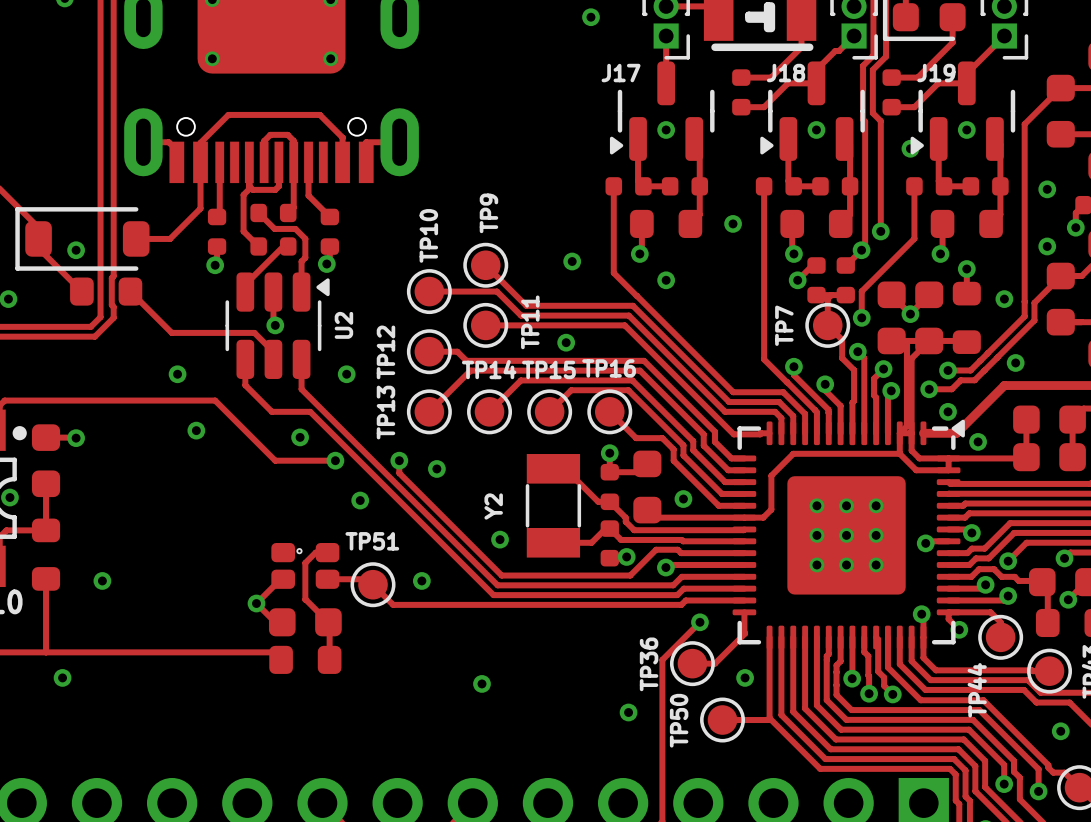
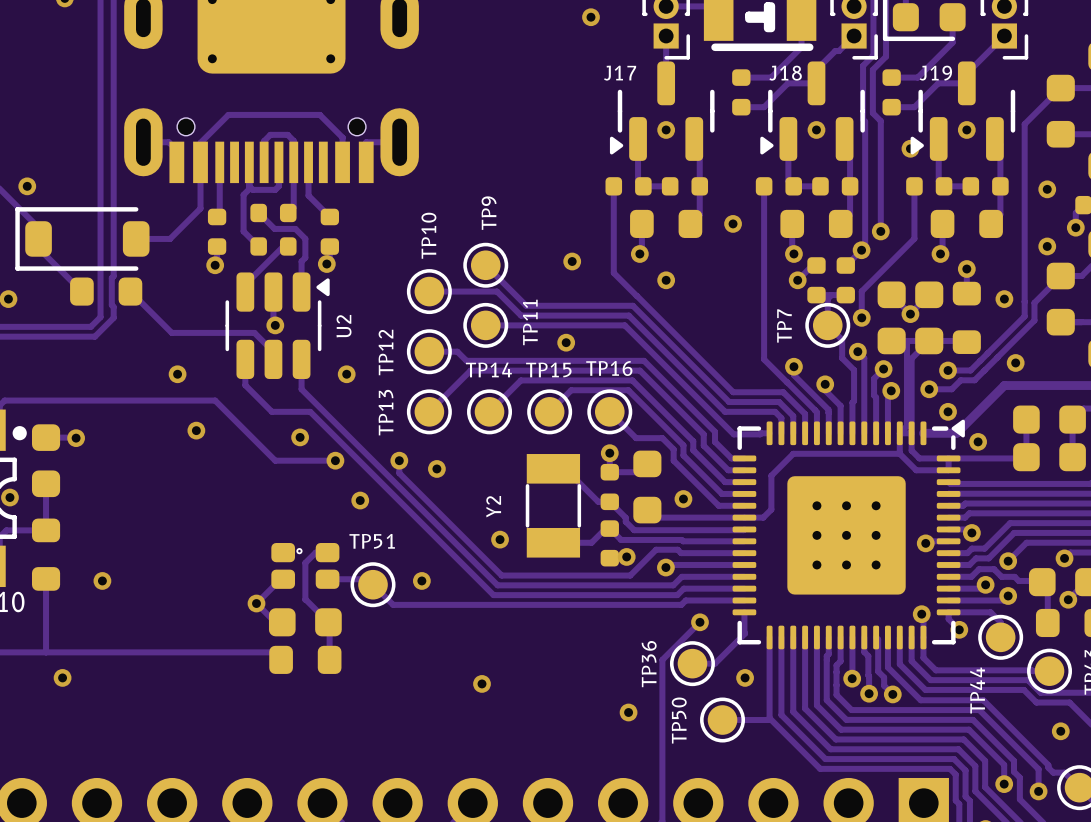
via position: (76, 250) -> (27, 186)

